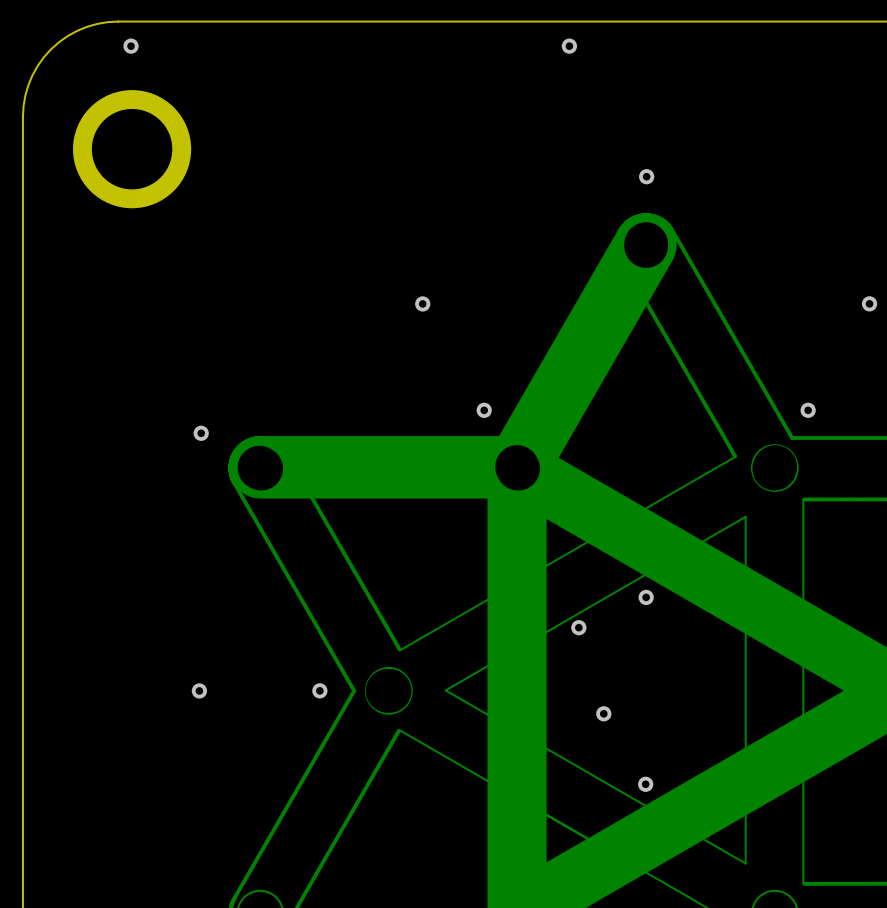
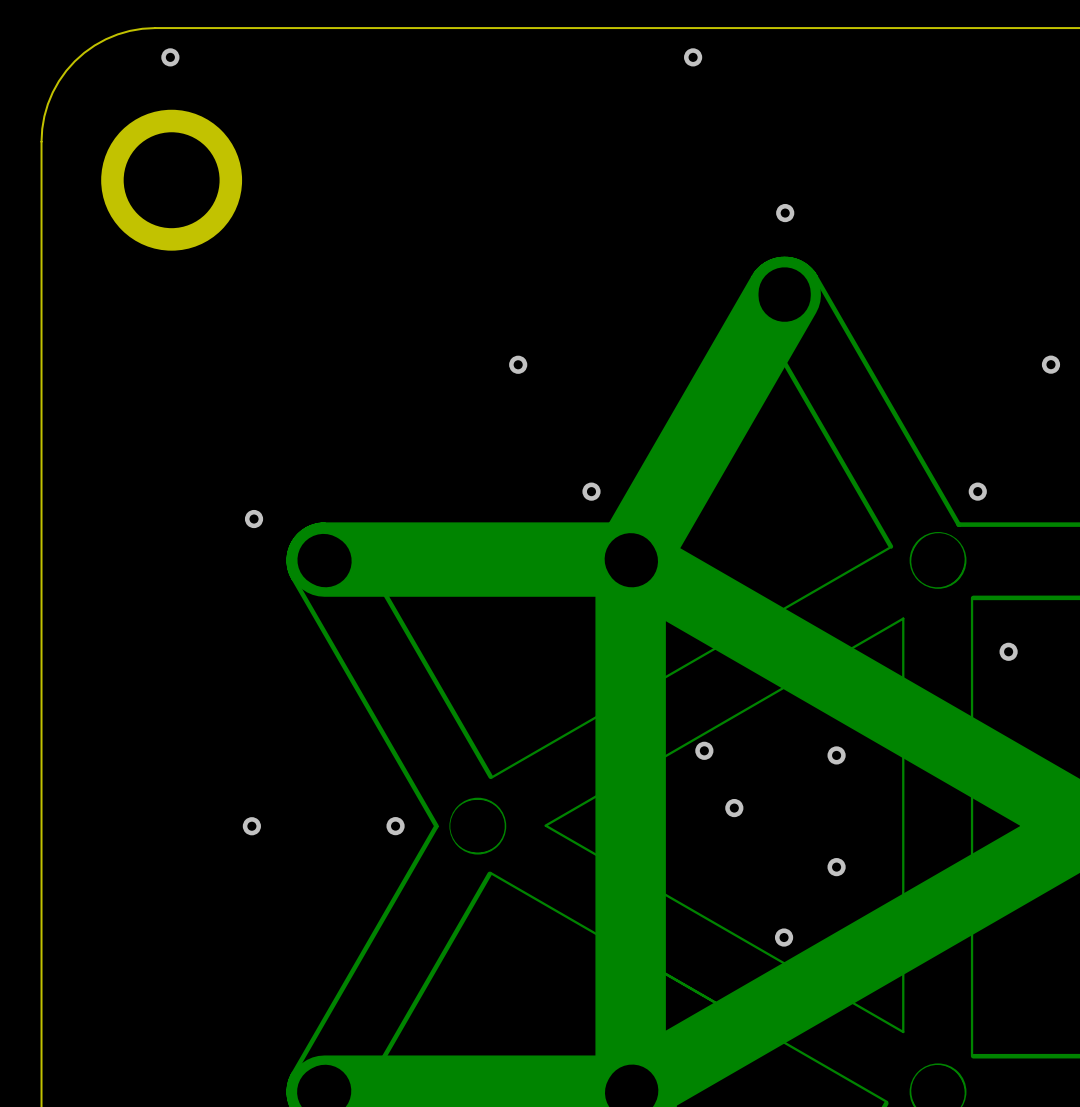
via: none -> (1008, 651)
via: (646, 597) -> none
via: none -> (836, 755)
via position: (603, 713) -> (734, 808)
via: none -> (836, 867)

